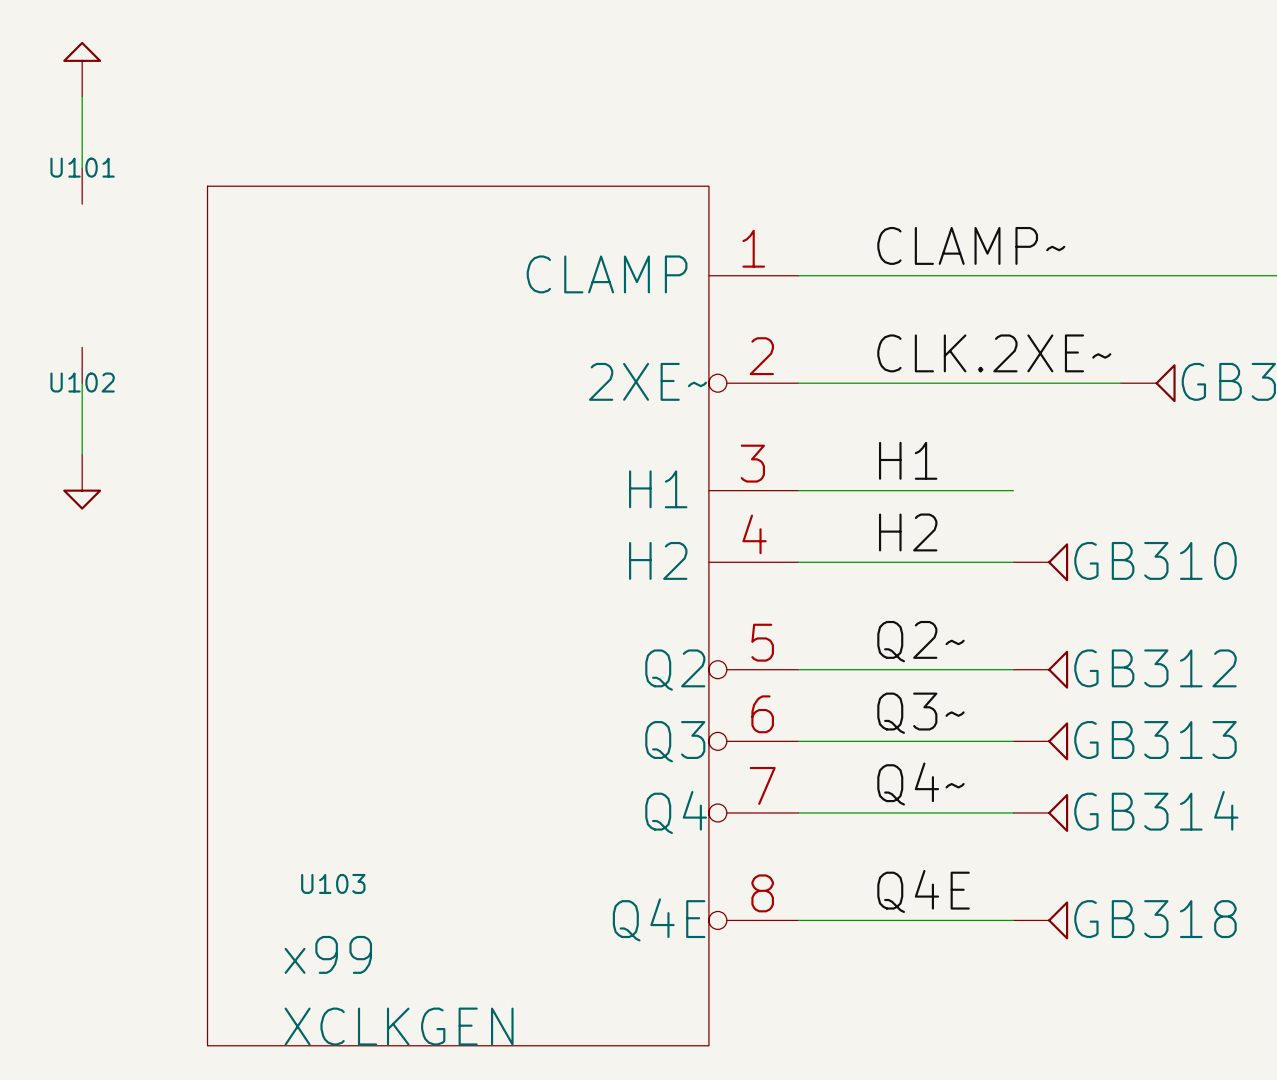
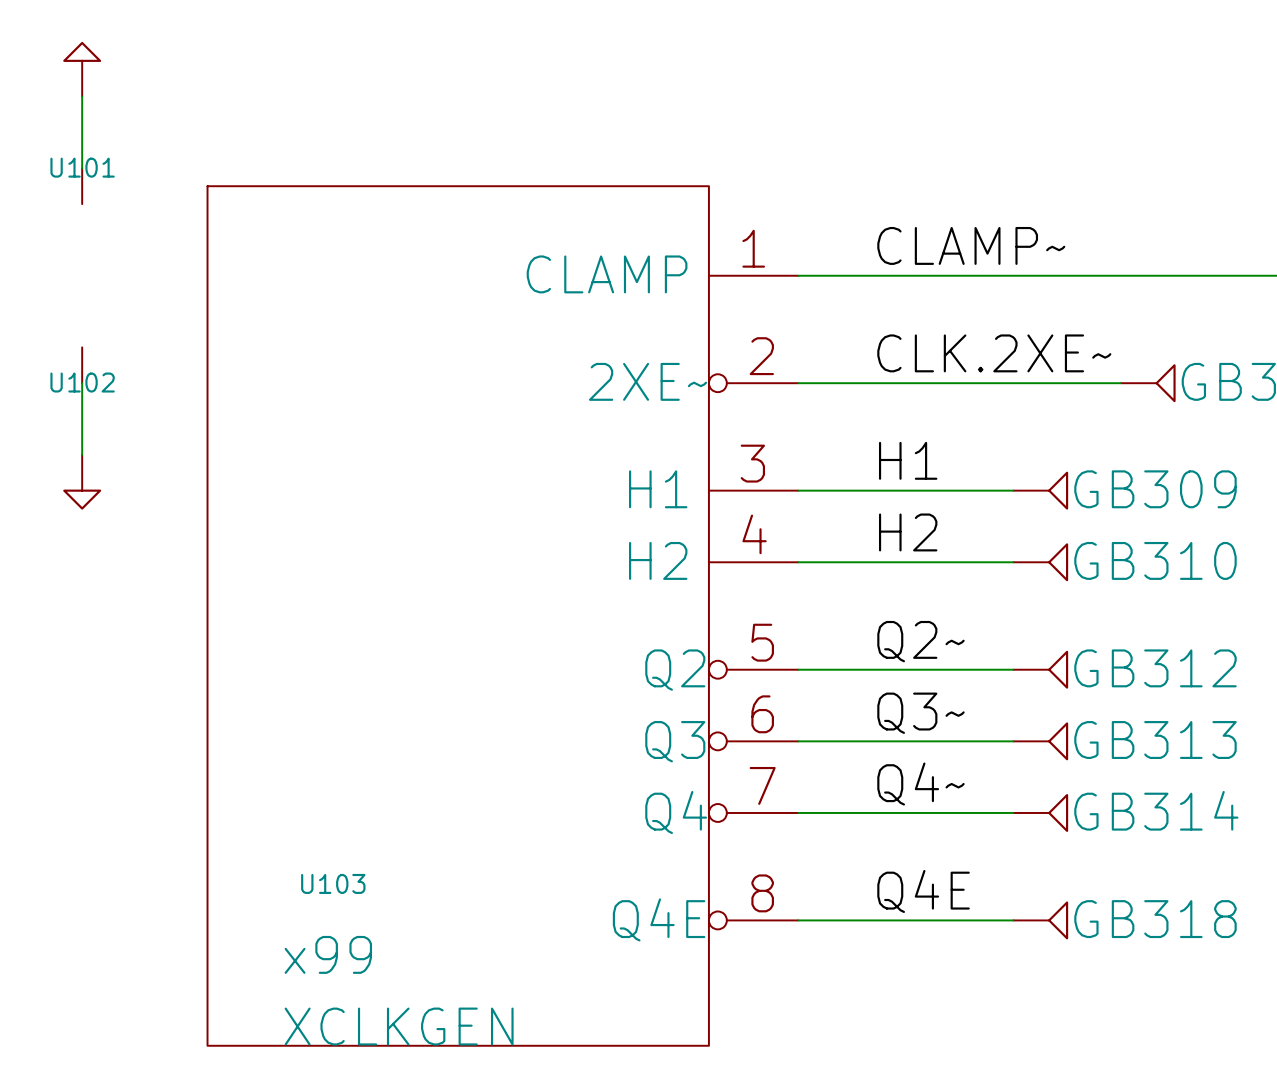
GB309: none -> (1040, 490)

